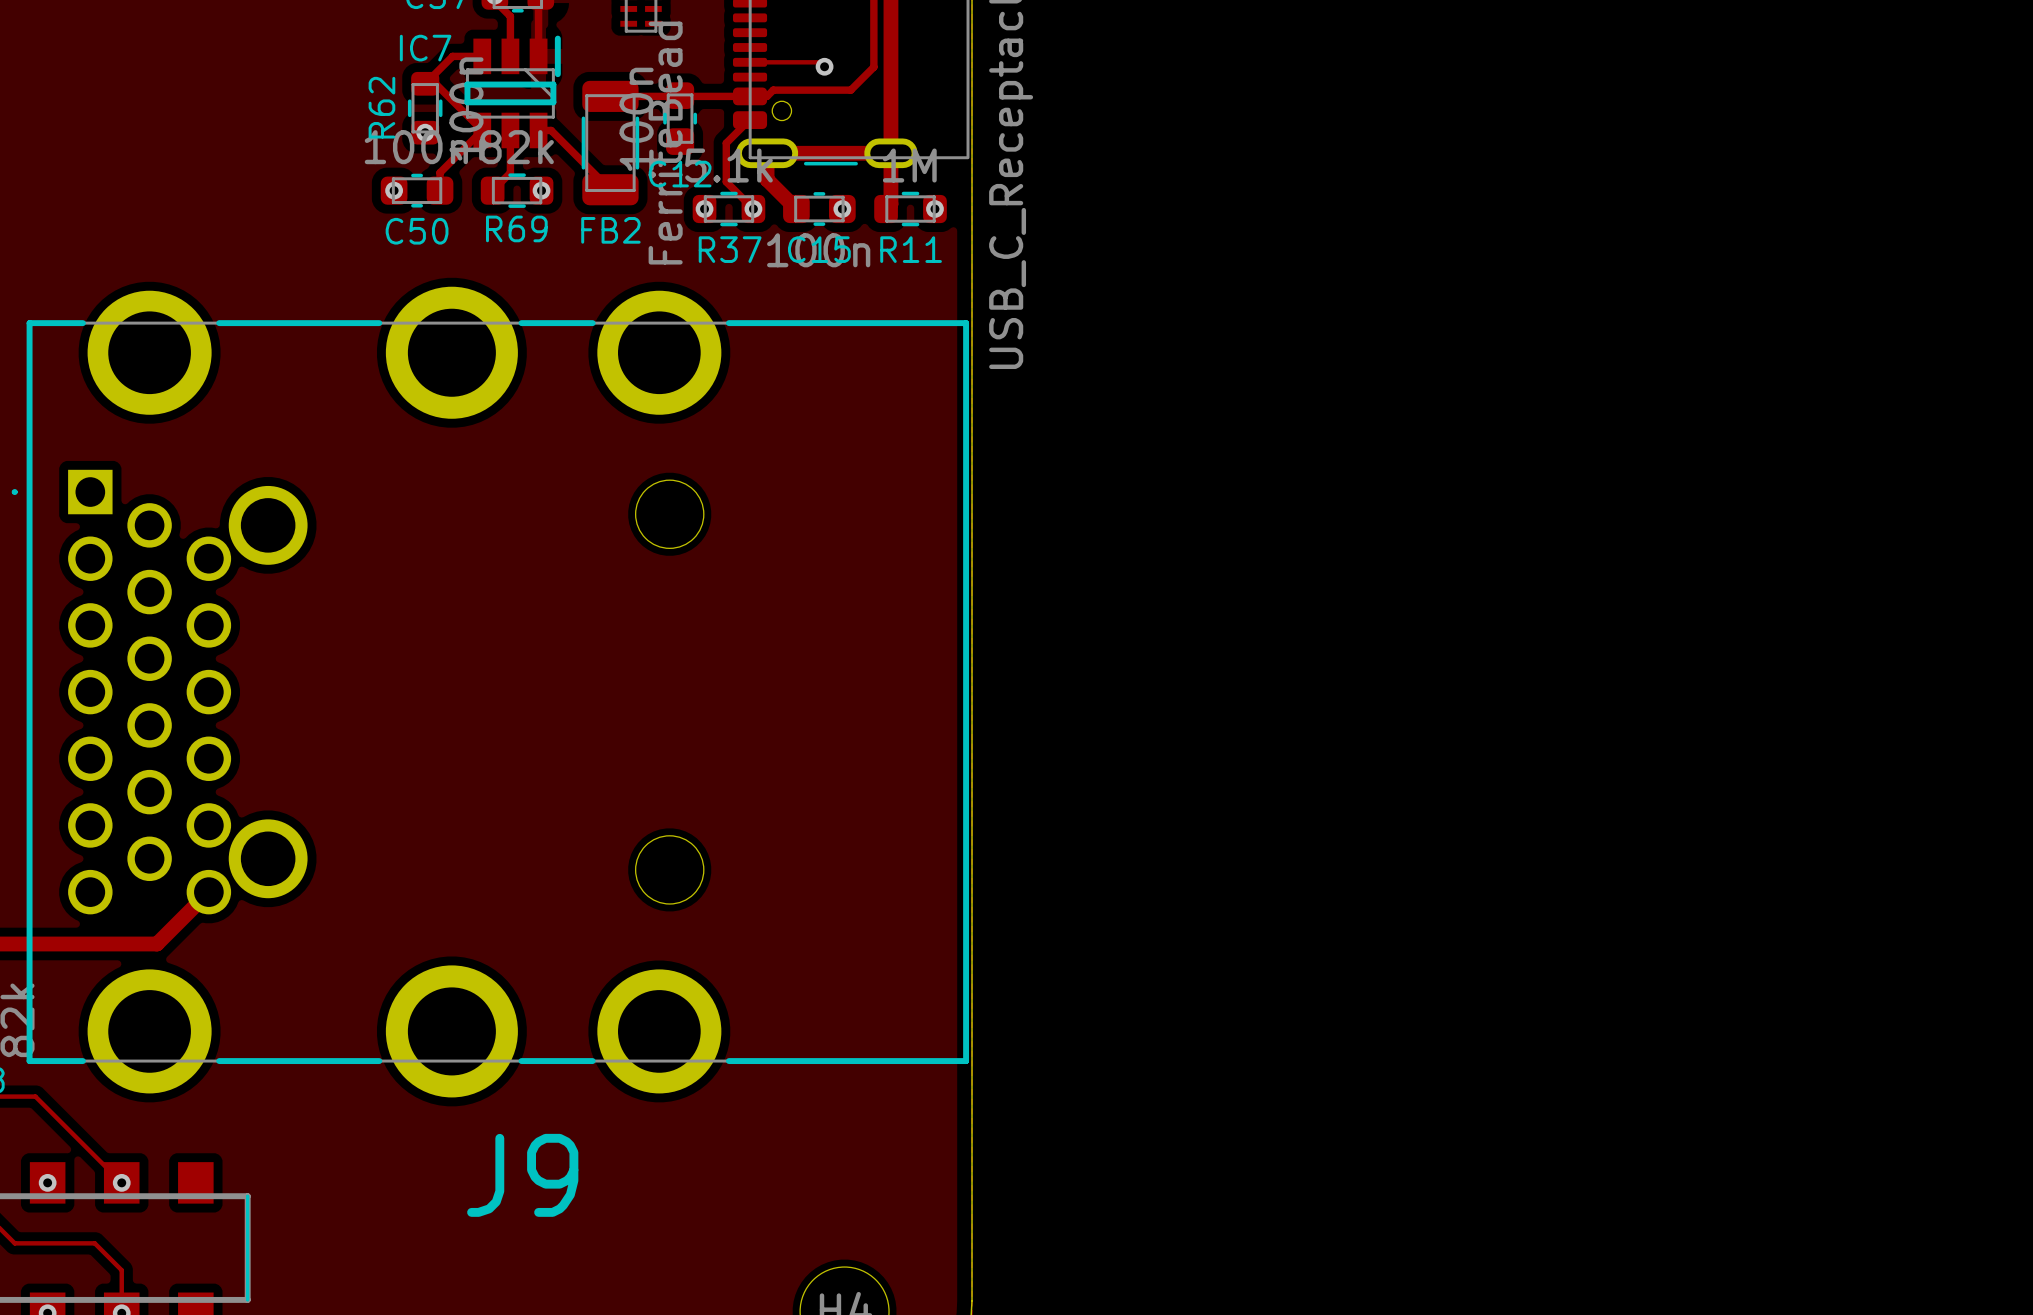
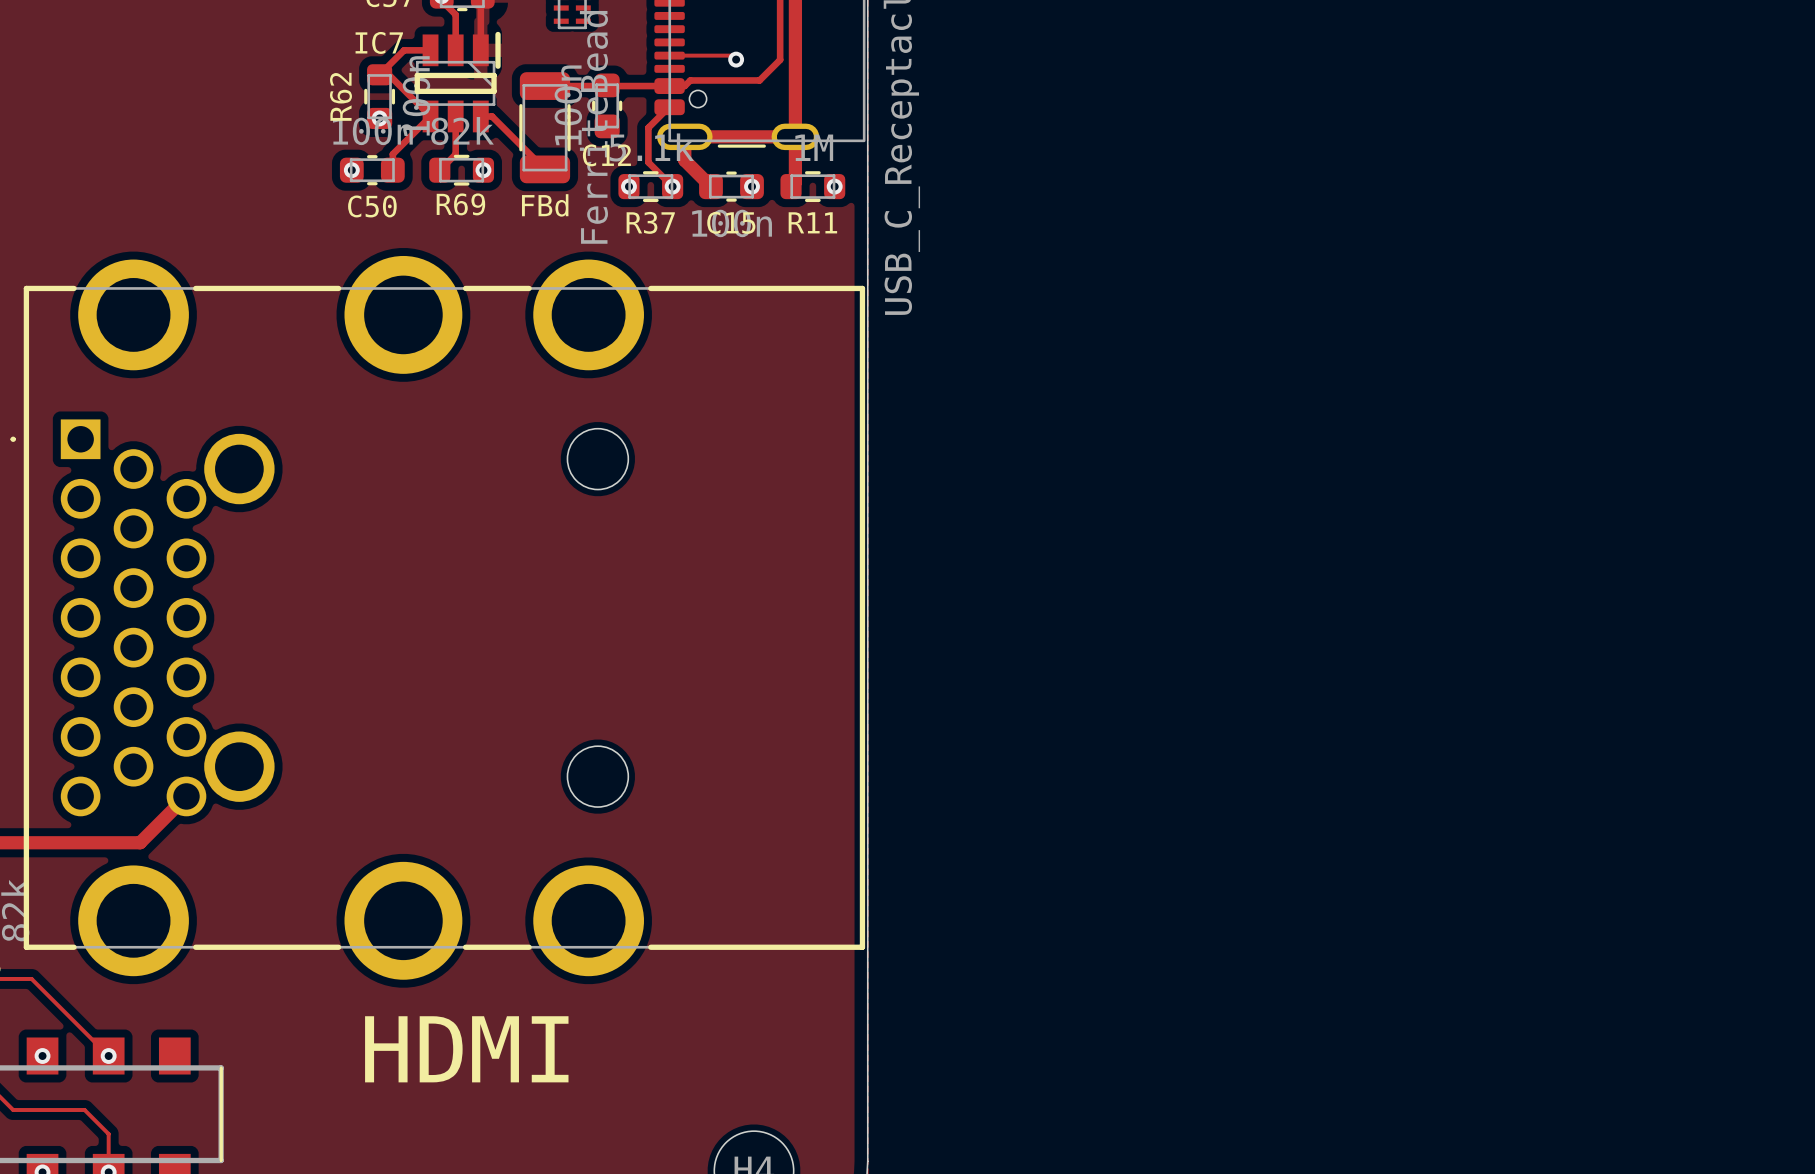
FB2 name: FB2 (610, 230) -> FBd (545, 205)
J9 name: J9 (522, 1175) -> HDMI (466, 1049)

